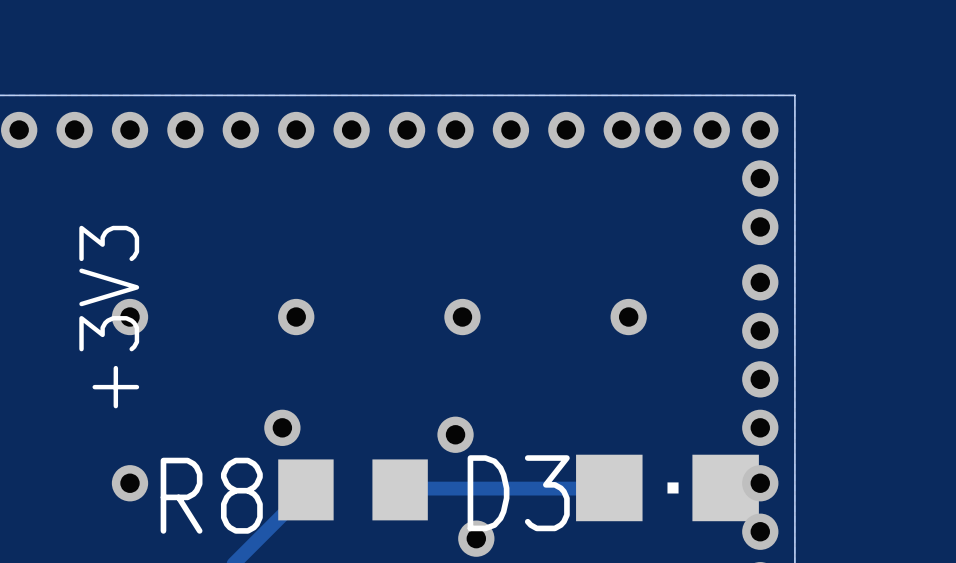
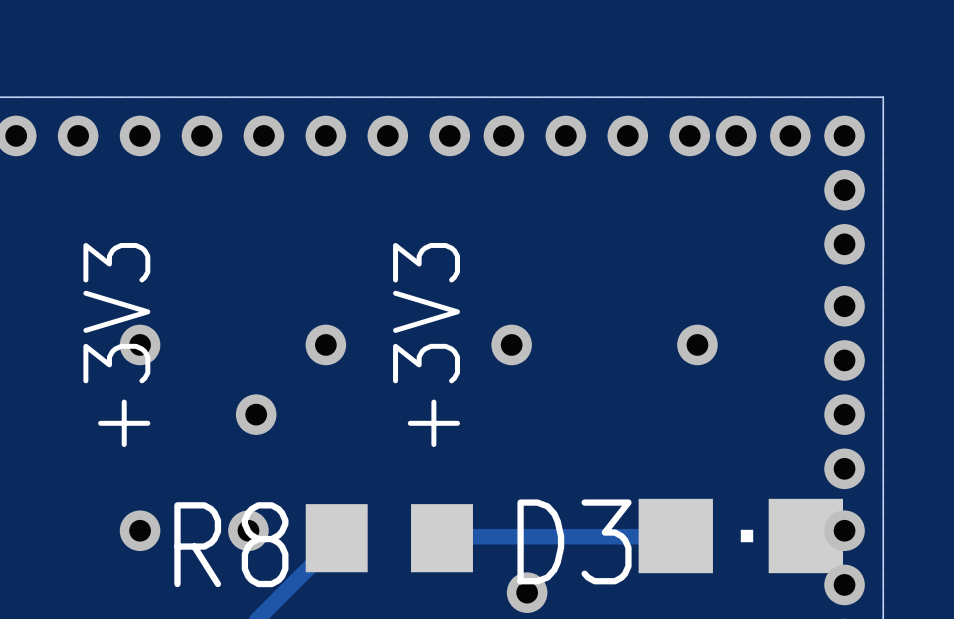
text: none -> +3V3 (426, 345)
via: none -> (256, 414)
via: (282, 427) -> none
via: (455, 434) -> none
via: none -> (248, 530)

